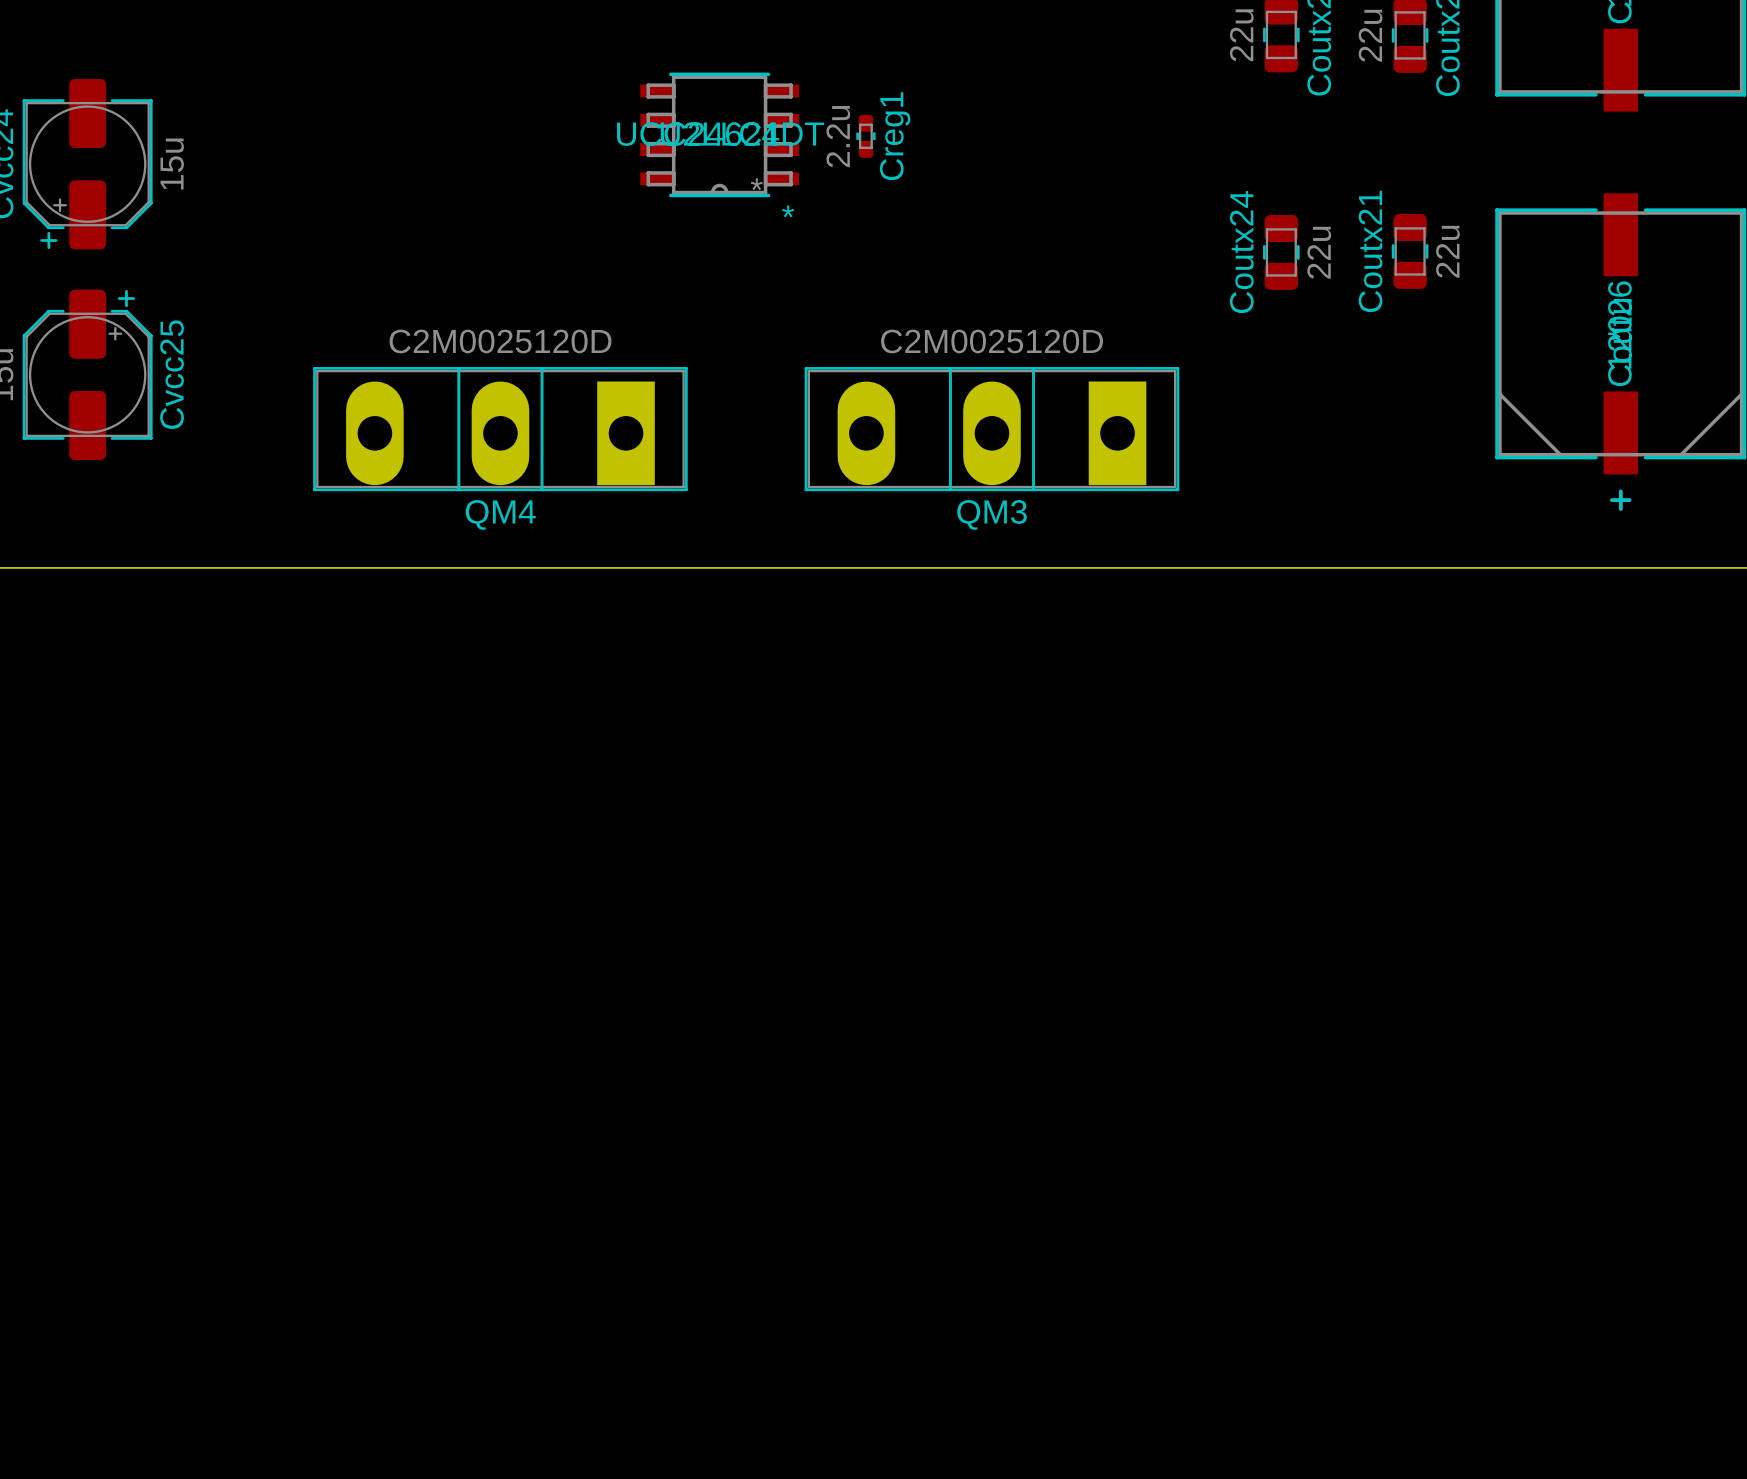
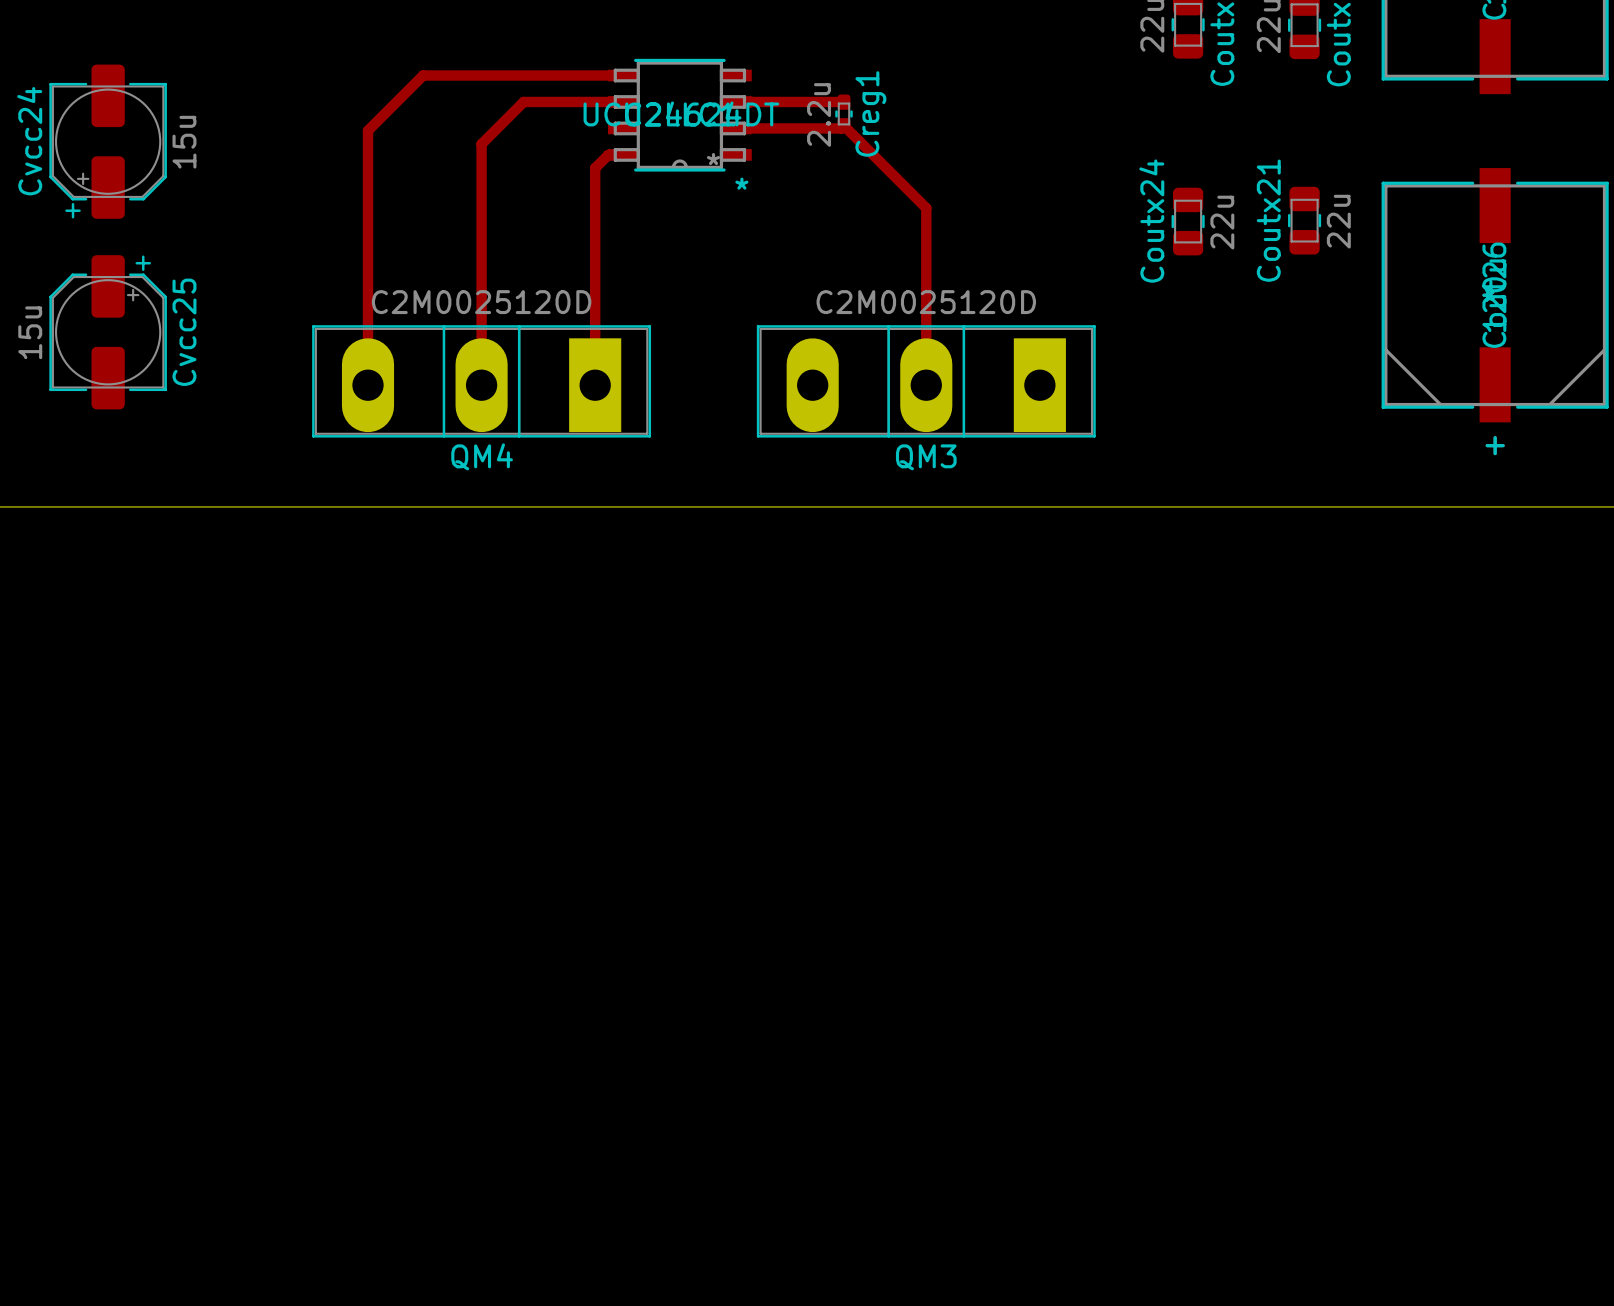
top track: none -> (623, 75) (423, 75) (368, 130) (368, 385)
top track: none -> (623, 101) (523, 101) (481, 144) (481, 385)
top track: none -> (736, 101) (843, 101)
Creg1 position: (865, 136) -> (844, 113)
top track: none -> (736, 128) (841, 128) (844, 125) (926, 208) (926, 385)
top track: none -> (623, 154) (608, 154) (595, 168) (595, 385)

